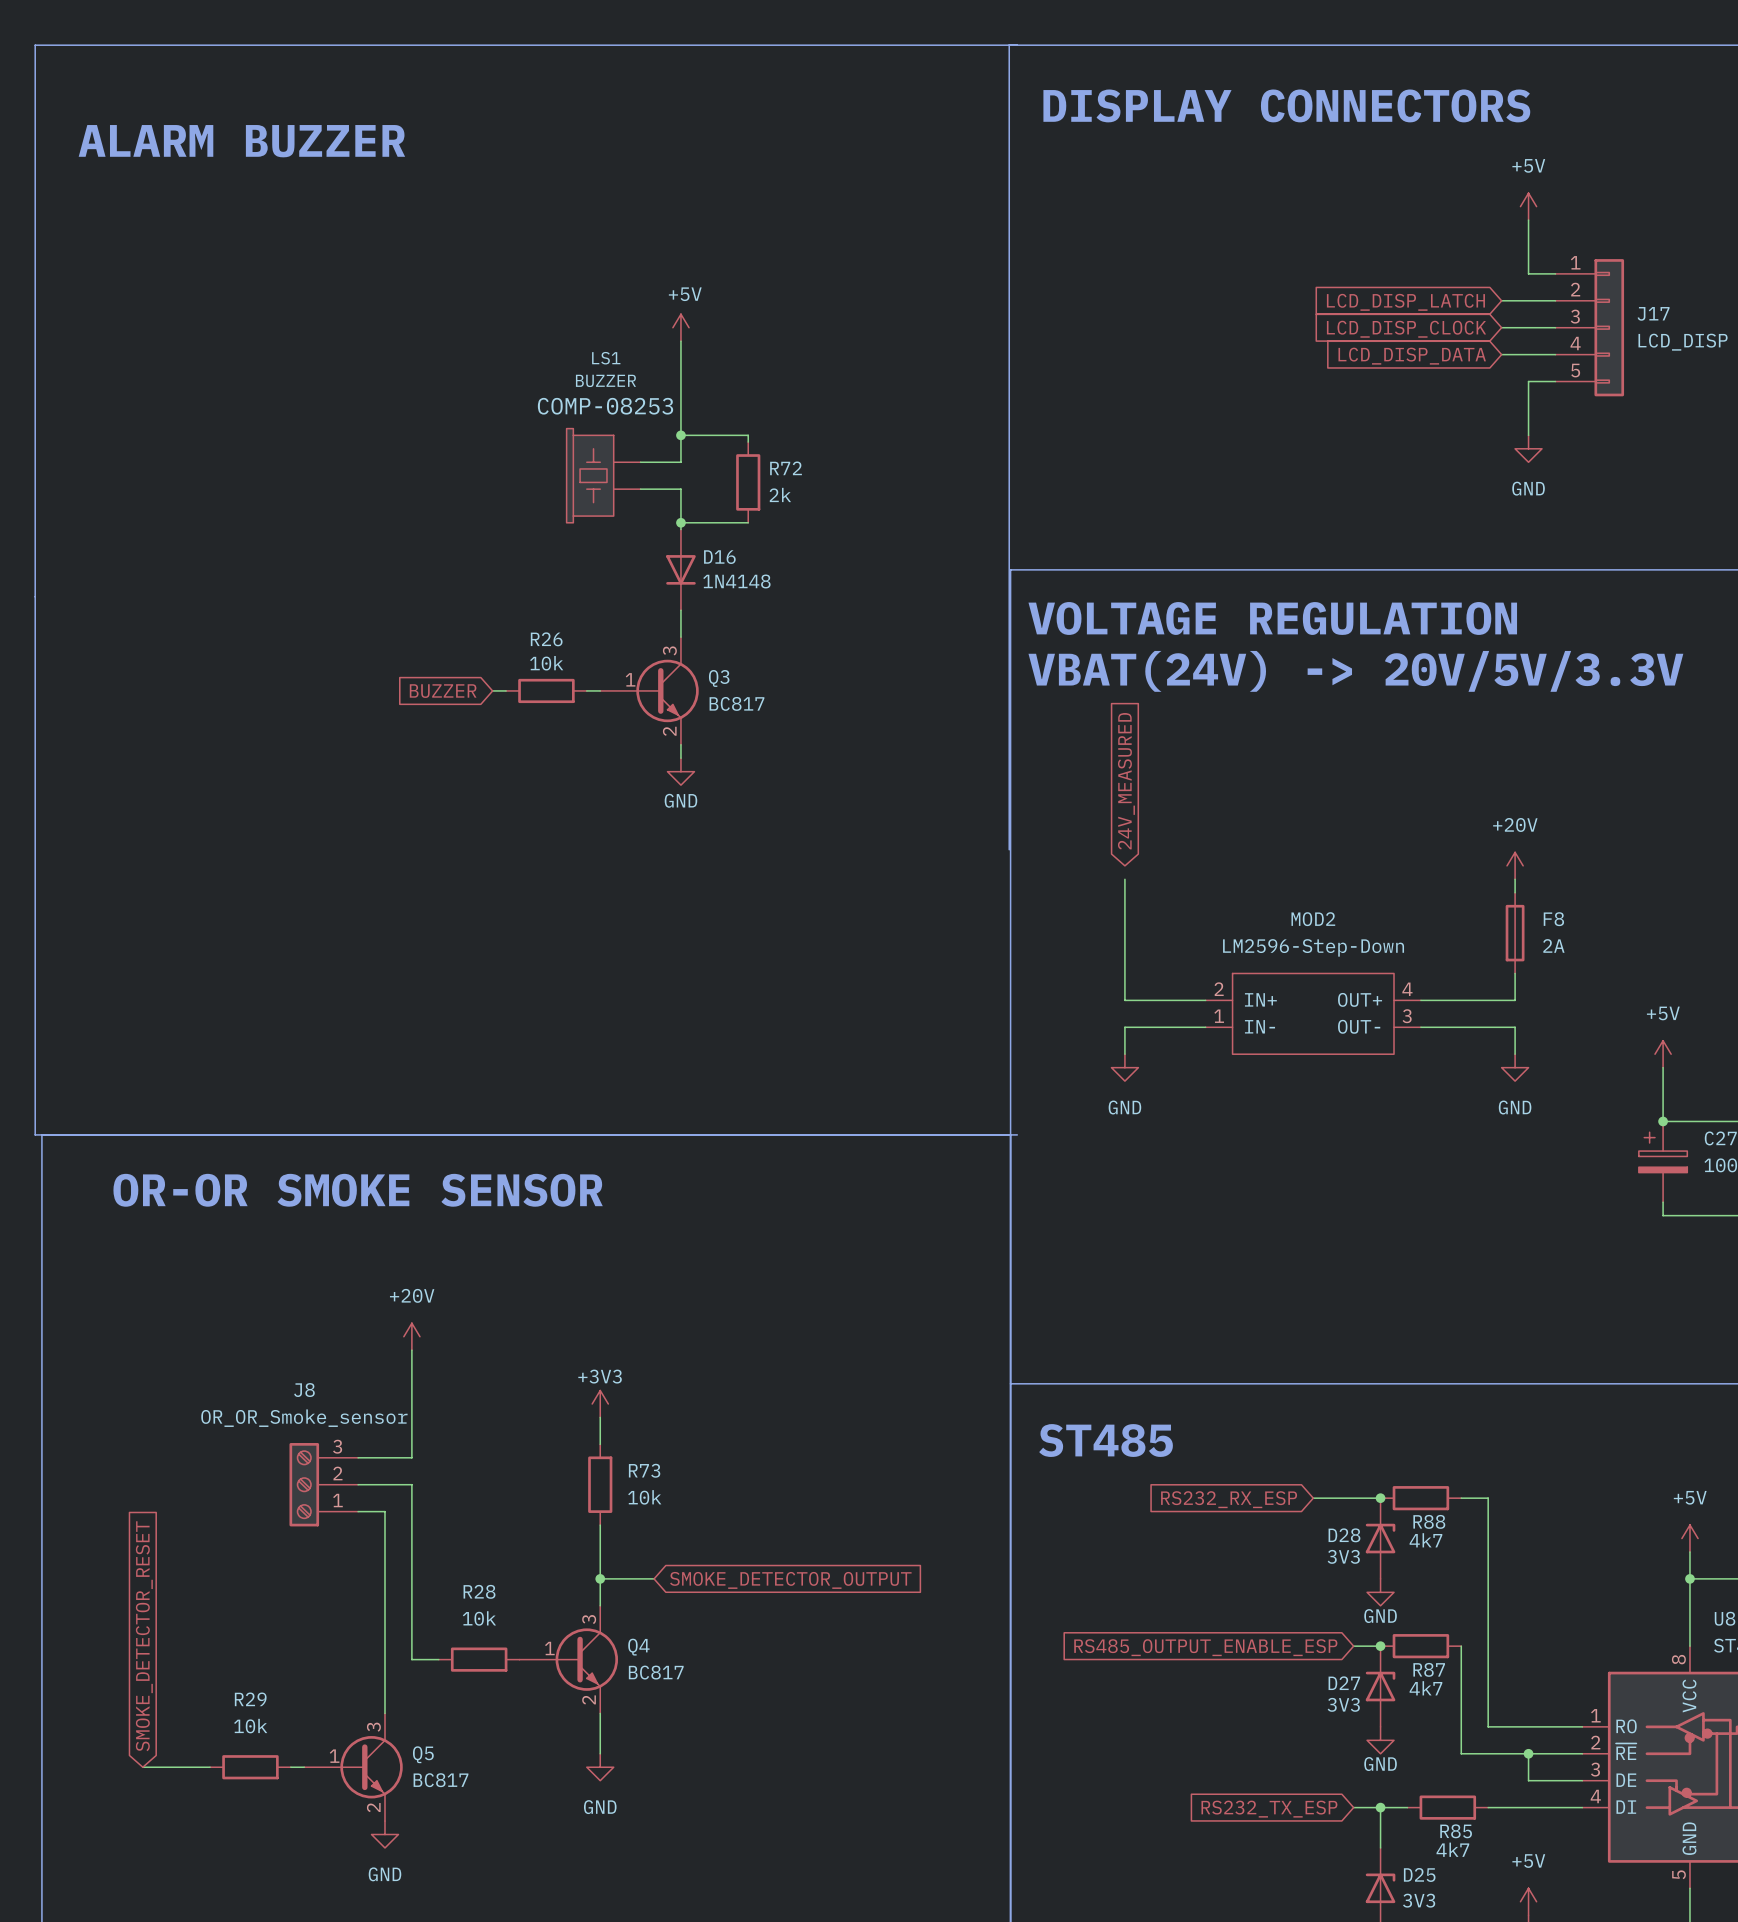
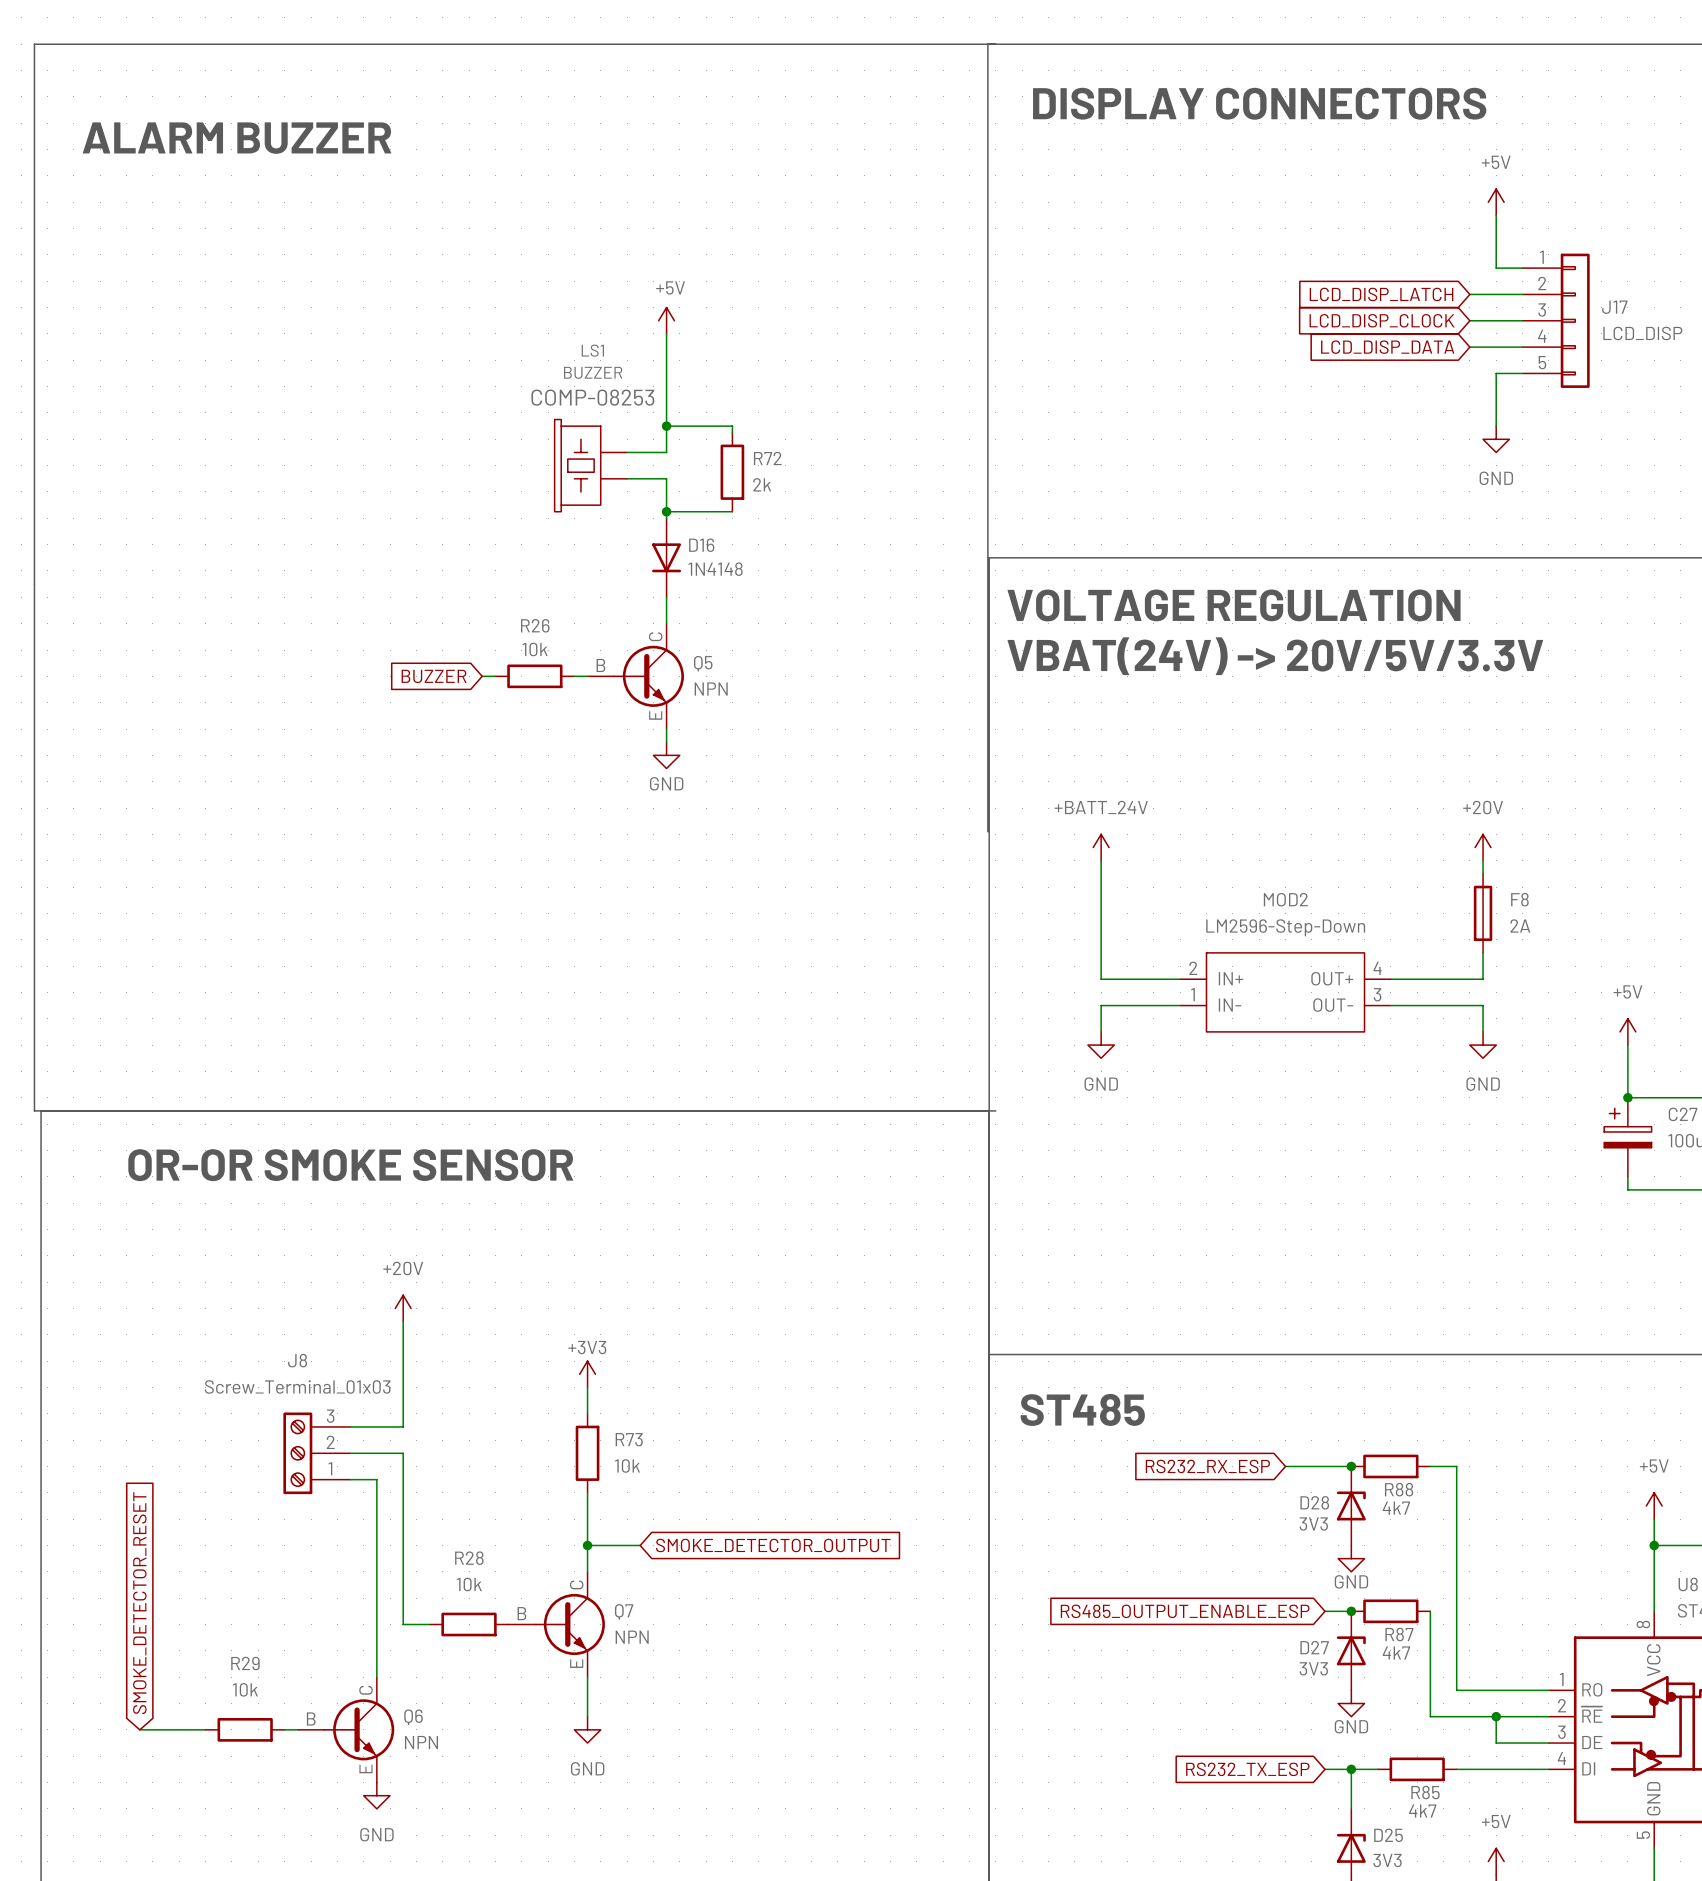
Q3: BC817 (649, 690) -> none
global label: 24V_MEASURED (1126, 781) -> none
power symbol: none -> +BATT_24V (1101, 847)
J8 value: OR_OR_Smoke_sensor (304, 1418) -> Screw_Terminal_01x03 (297, 1386)
Q4: BC817 (568, 1659) -> none
Q7: none -> NPN (556, 1624)
Q5 symbol: [304, 1713, 403, 1822] -> [587, 623, 684, 730]
Q6: none -> NPN (346, 1729)
Q5 value: BC817 (440, 1780) -> NPN (711, 689)

